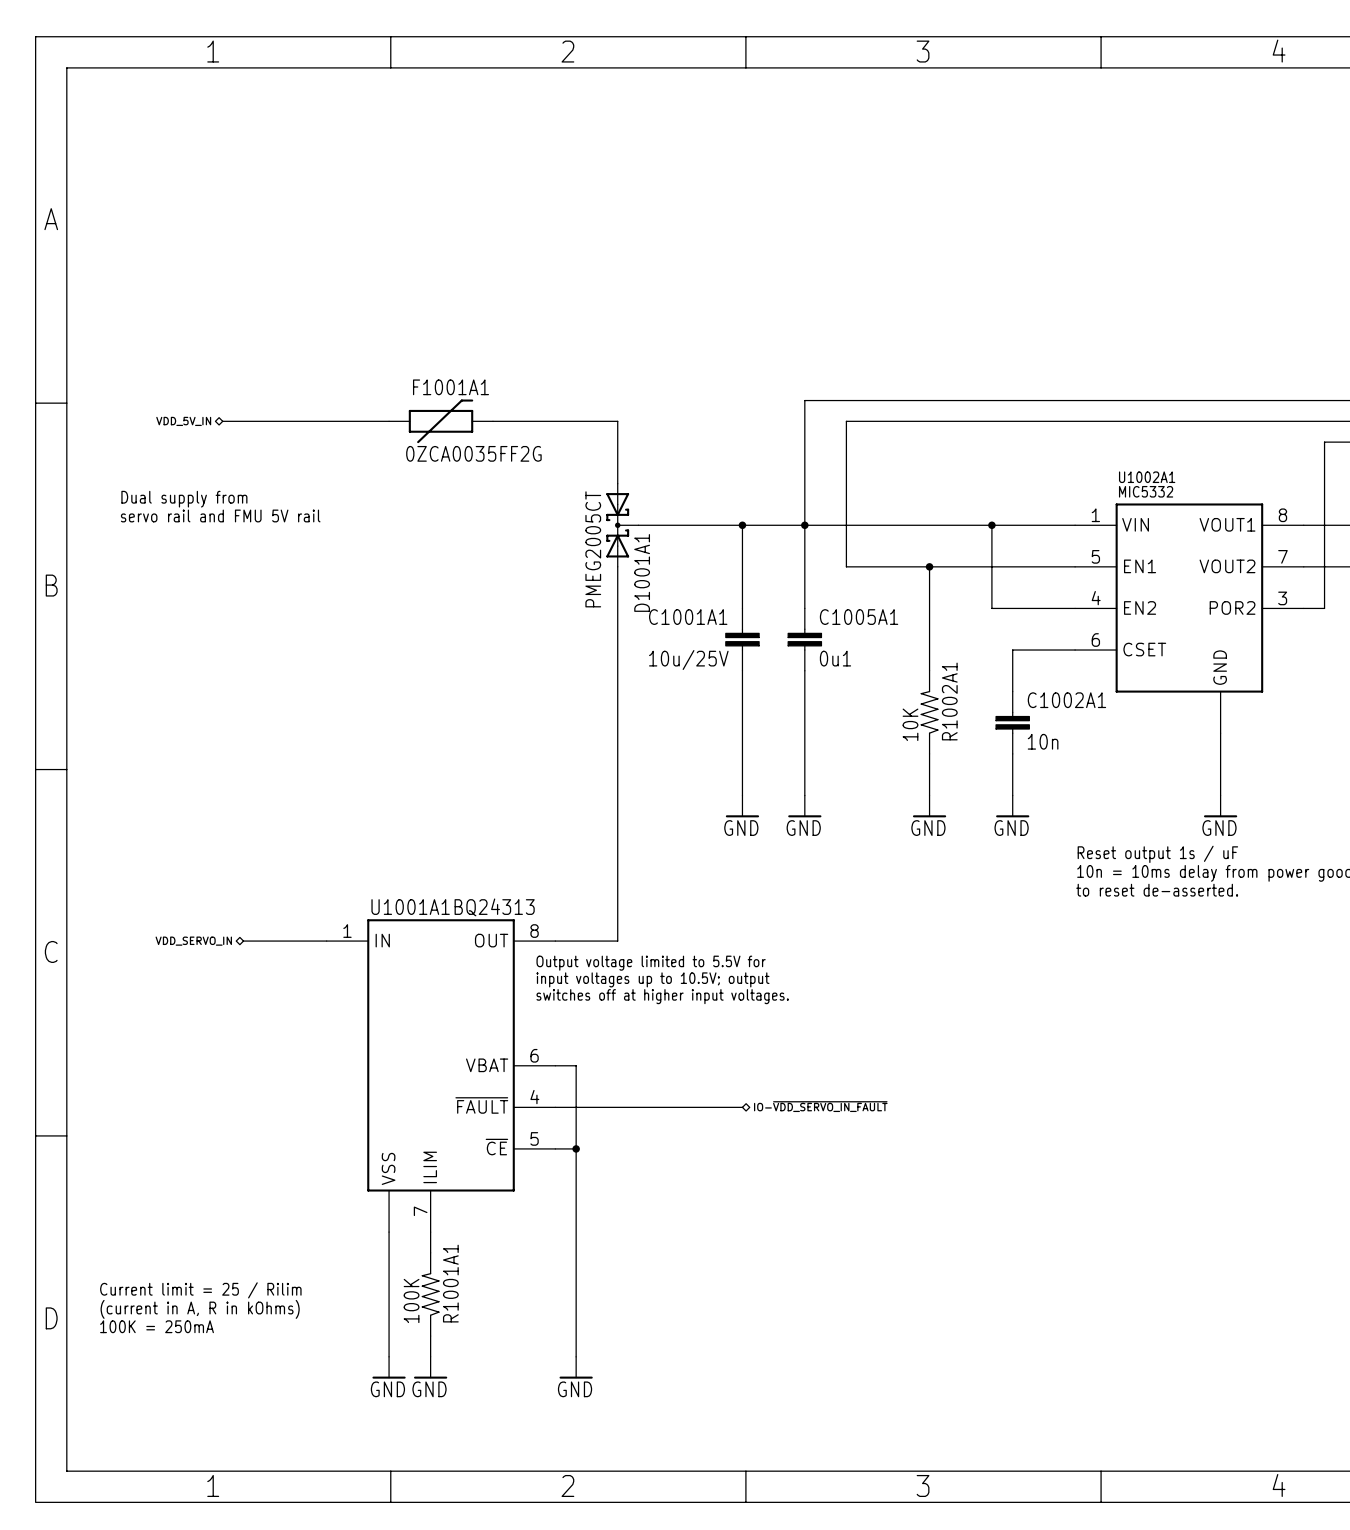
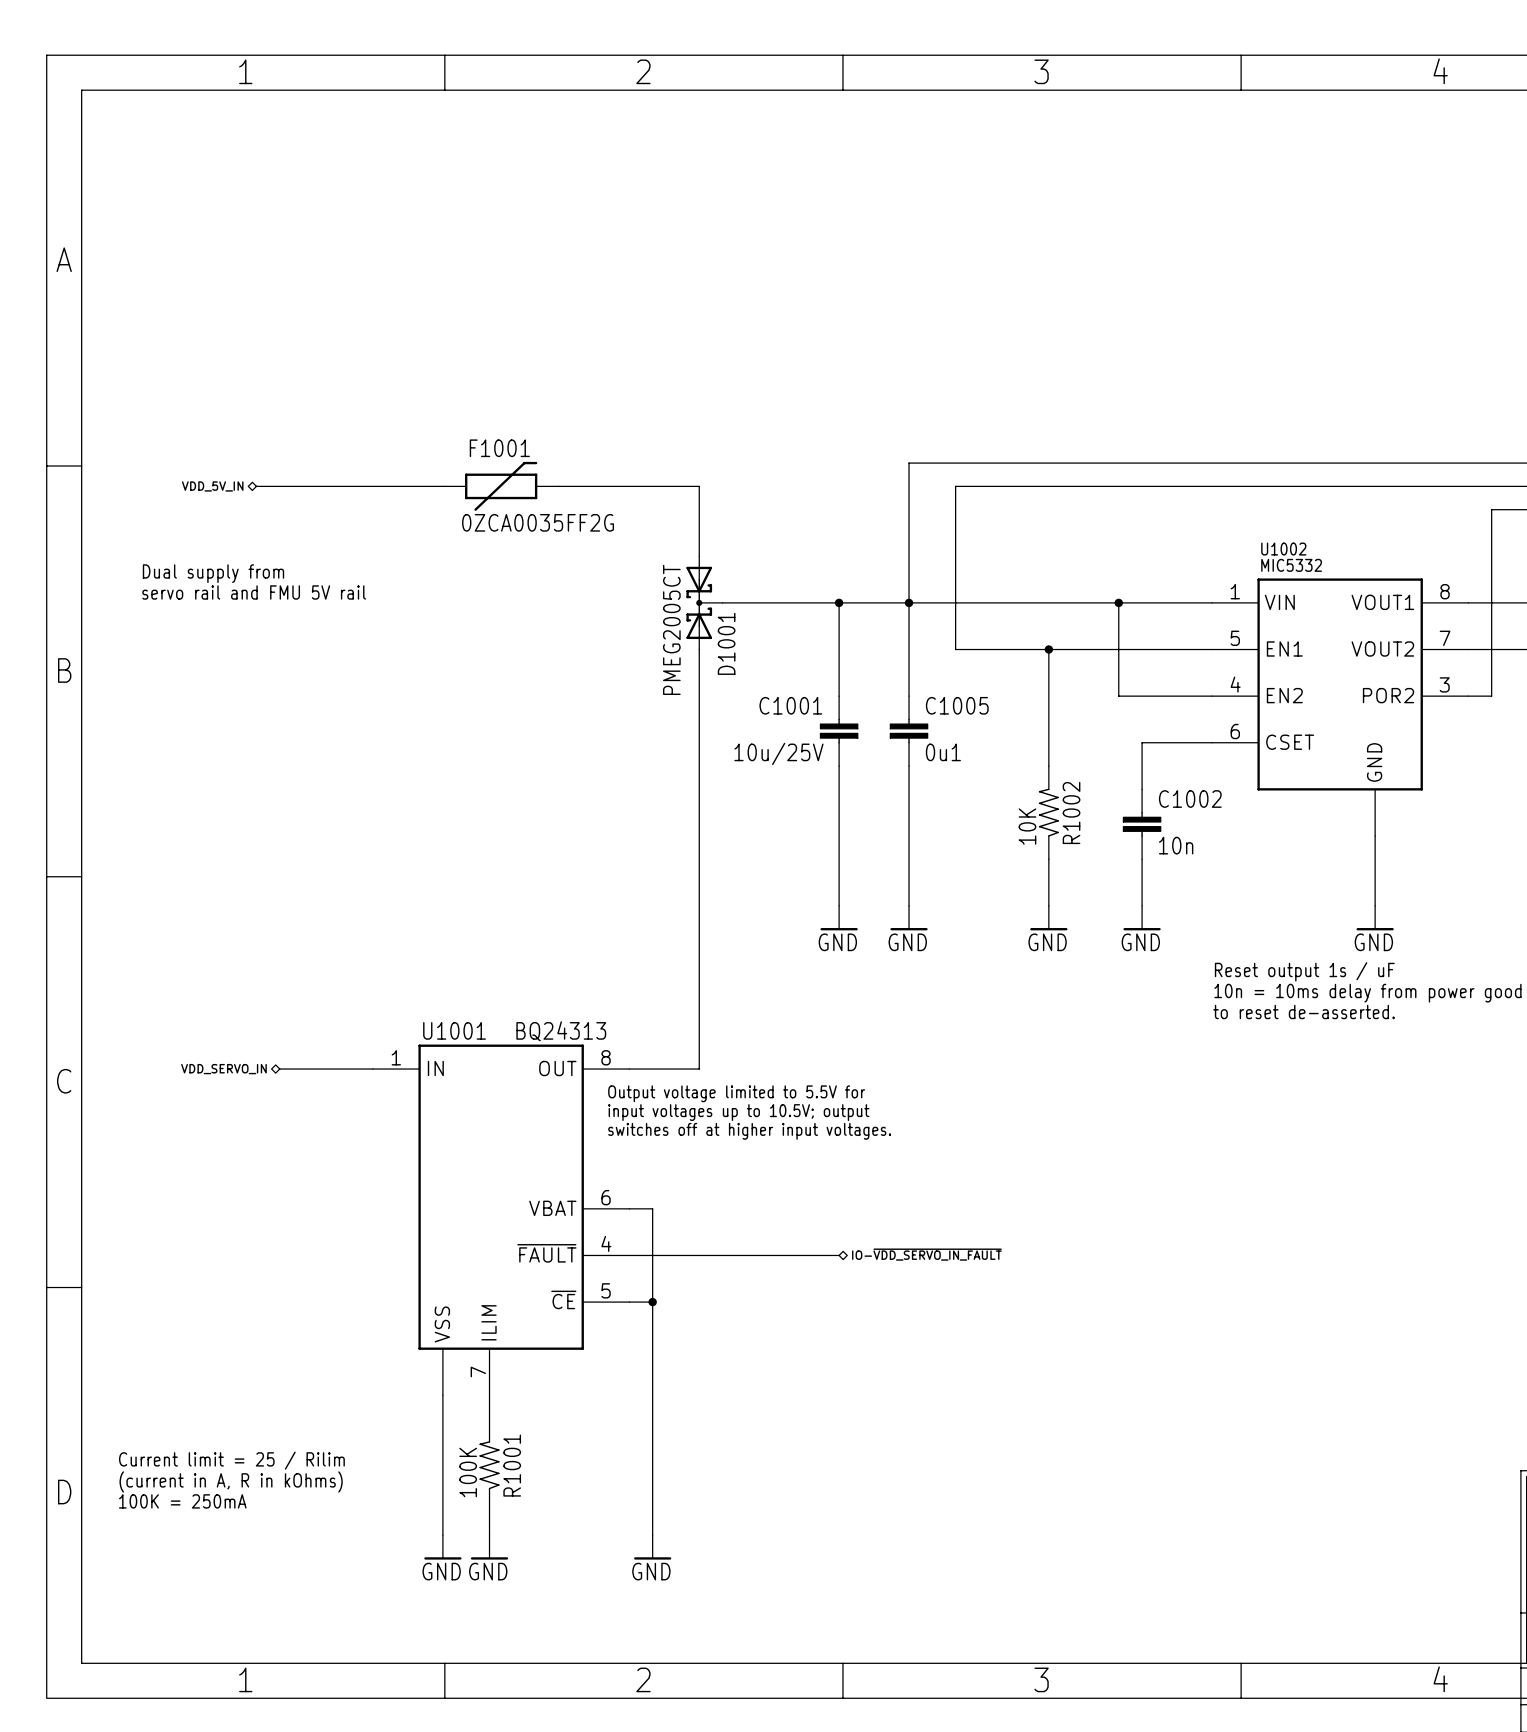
F1001A1 name: F1001A1 (451, 387) -> F1001 (499, 448)
U1002A1 name: U1002A1 (1147, 477) -> U1002 (1283, 549)
D1001A1 name: D1001A1 (642, 572) -> D1001 (726, 643)
C1001A1 name: C1001A1 (688, 617) -> C1001 (790, 705)
C1005A1 name: C1005A1 (859, 617) -> C1005 (957, 705)
C1002A1 name: C1002A1 (1066, 700) -> C1002 (1190, 799)
R1002A1 name: R1002A1 (949, 701) -> R1002 (1071, 813)
U1001A1 name: U1001A1 (410, 907) -> U1001 (454, 1030)
R1001A1 name: R1001A1 (450, 1283) -> R1001 (512, 1465)

